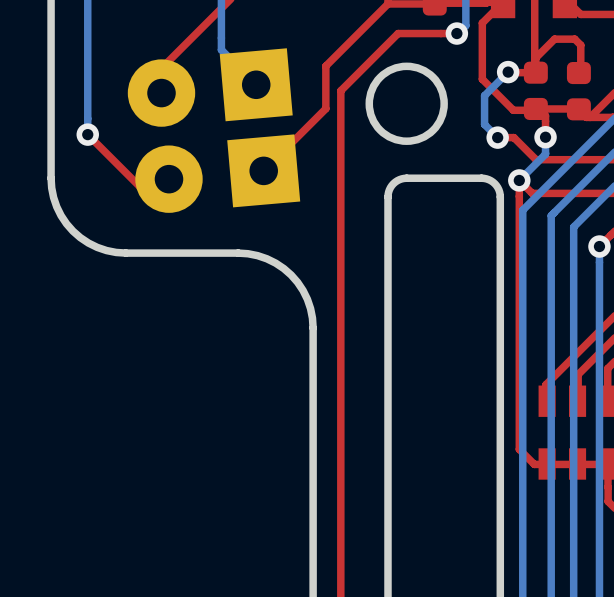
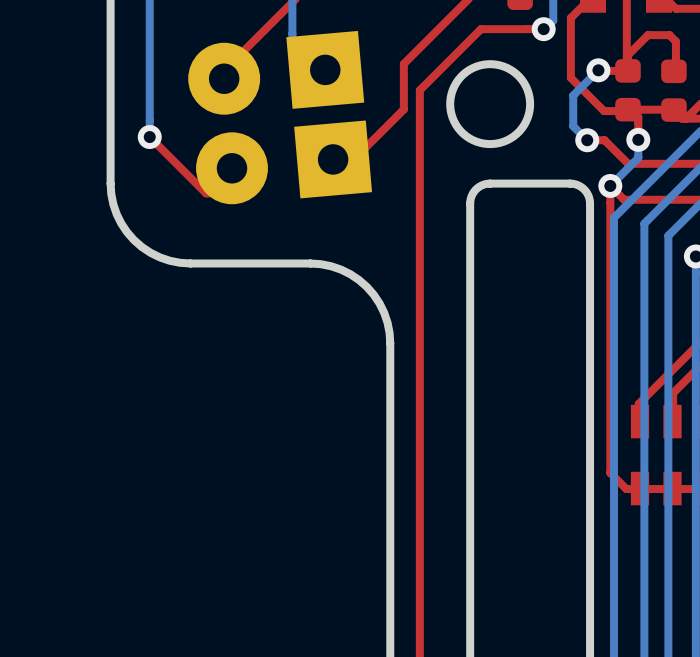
part: (210, 87) -> none
part: none -> (280, 117)
part: (217, 173) -> none

